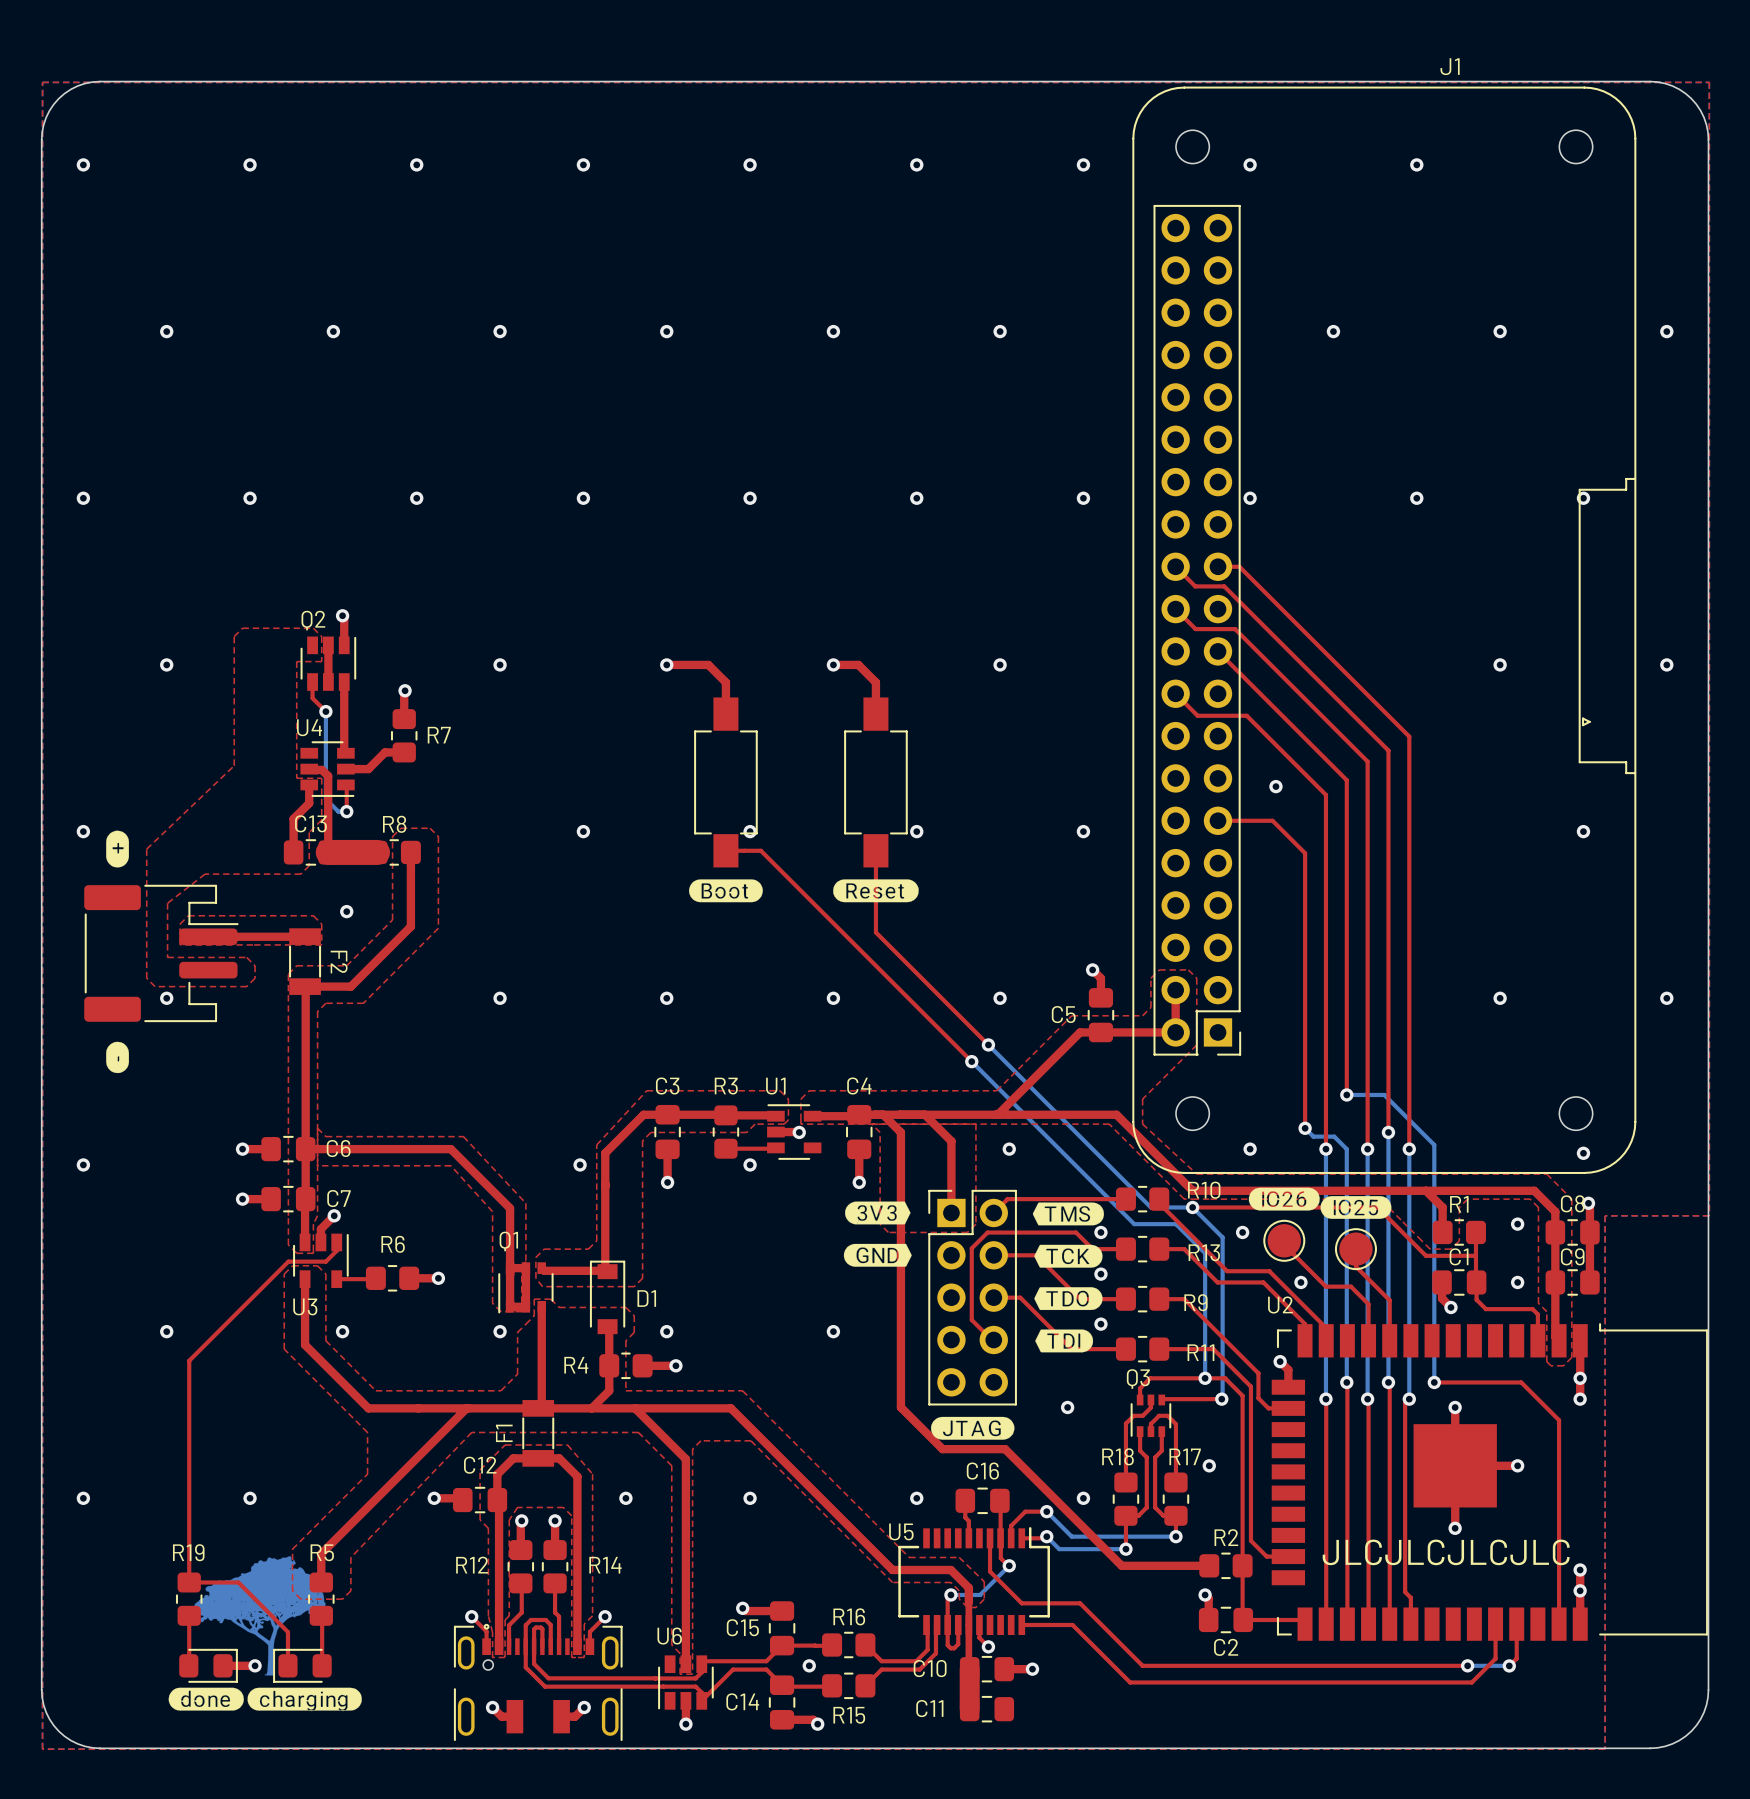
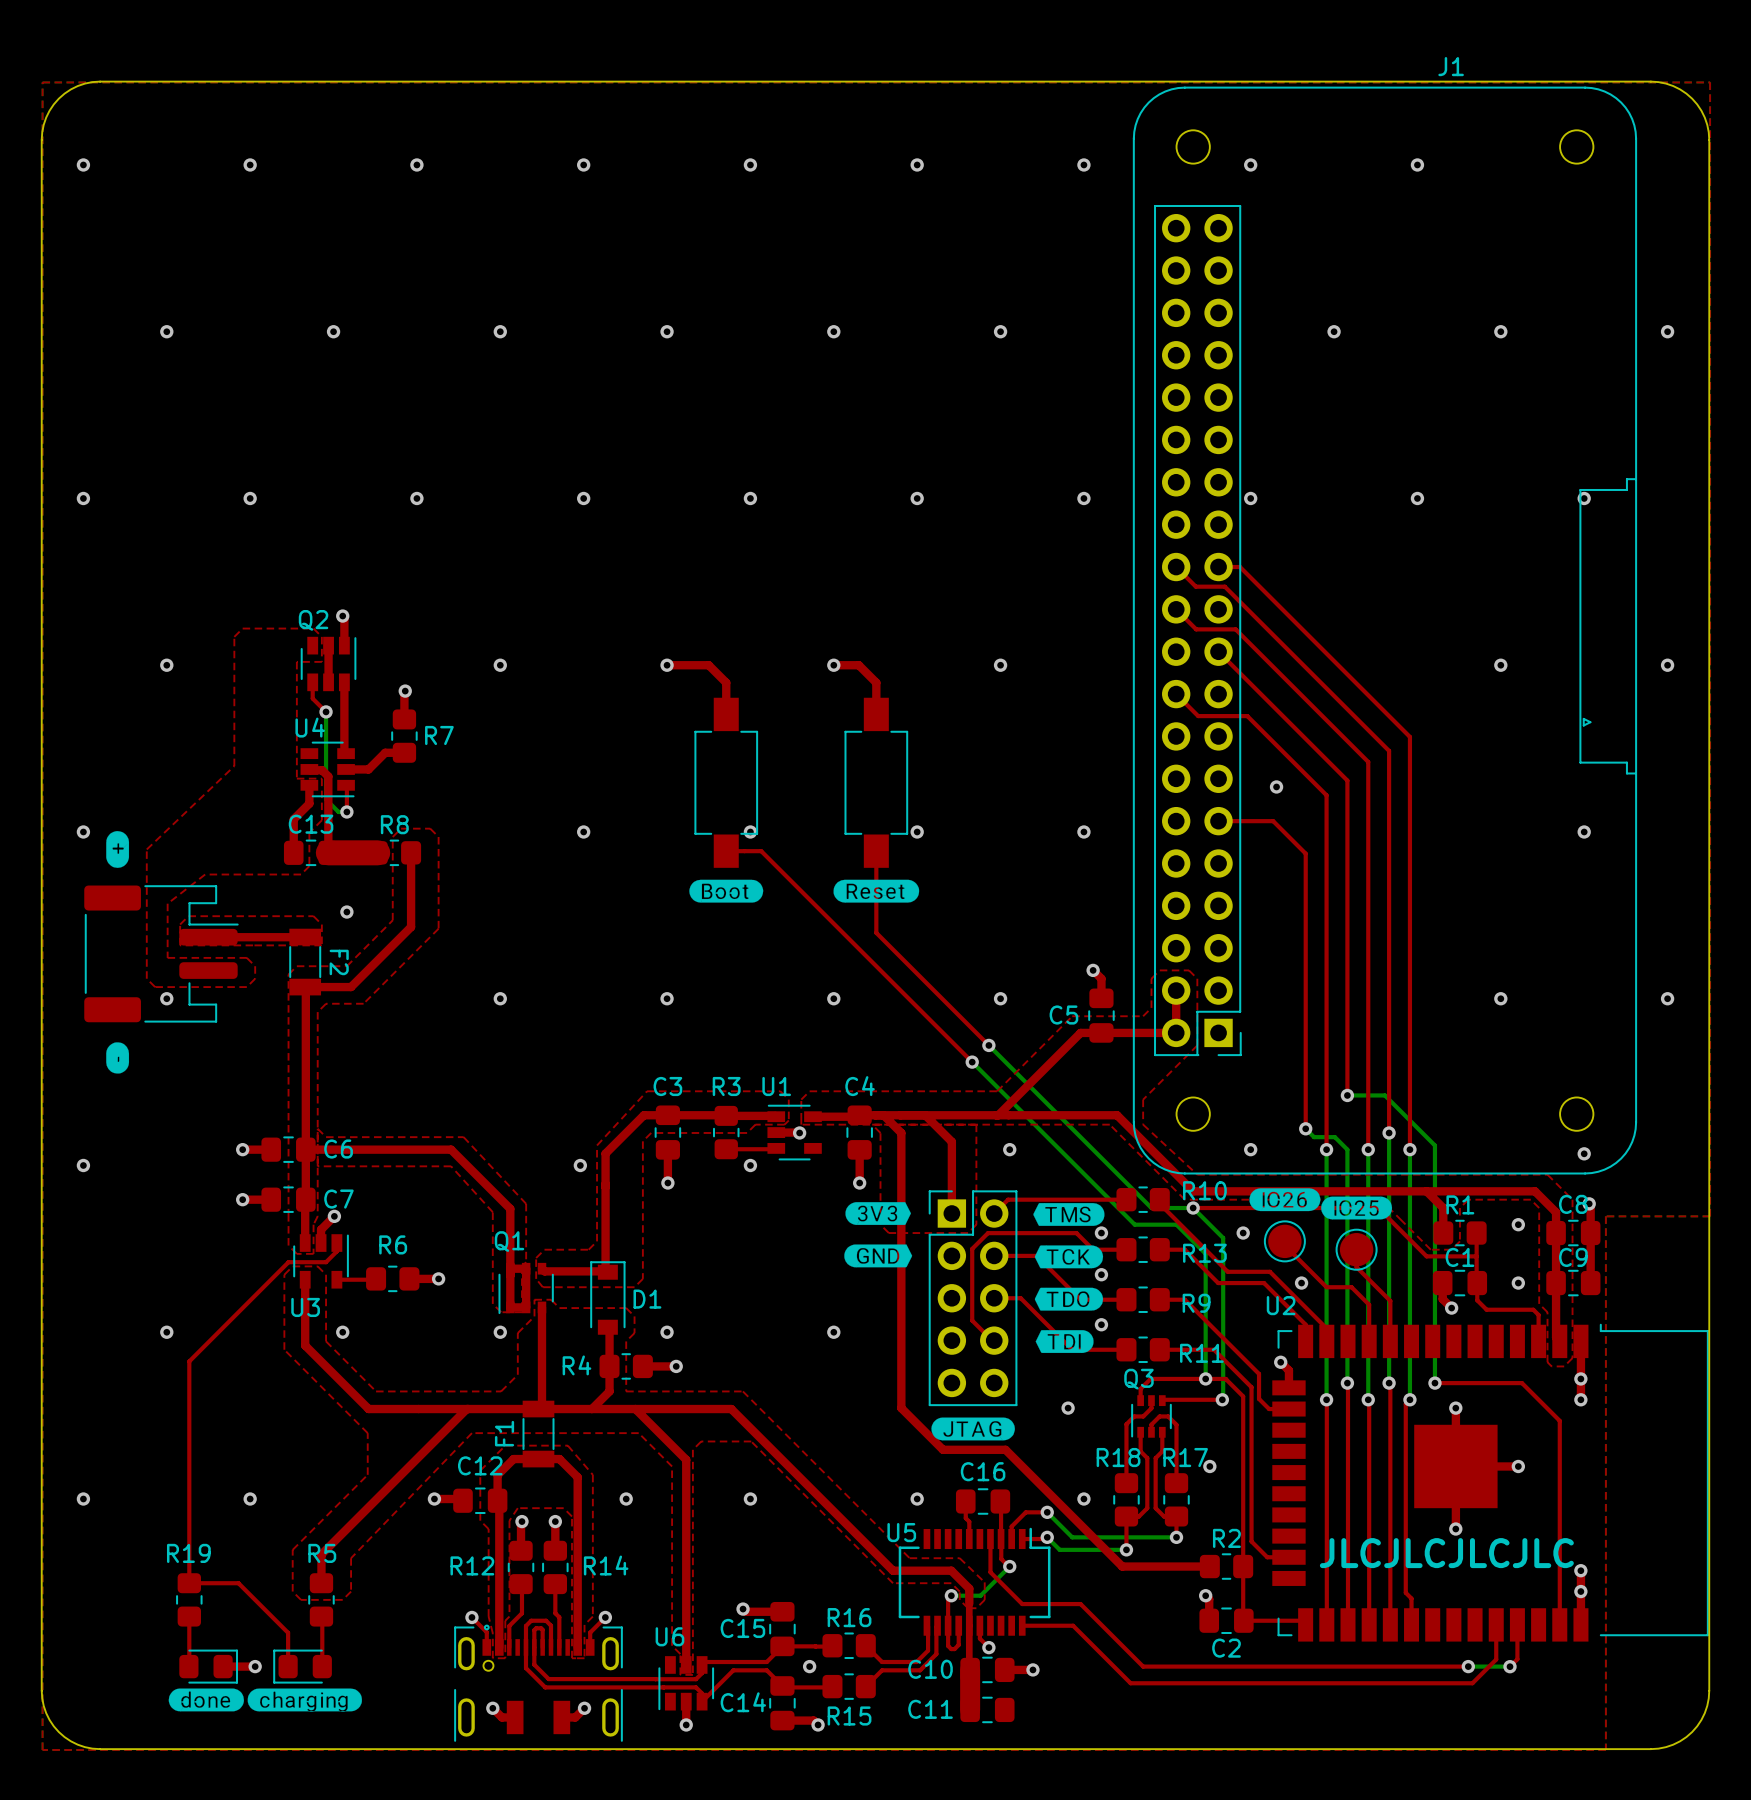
drawing: [192, 1556, 326, 1676] -> none

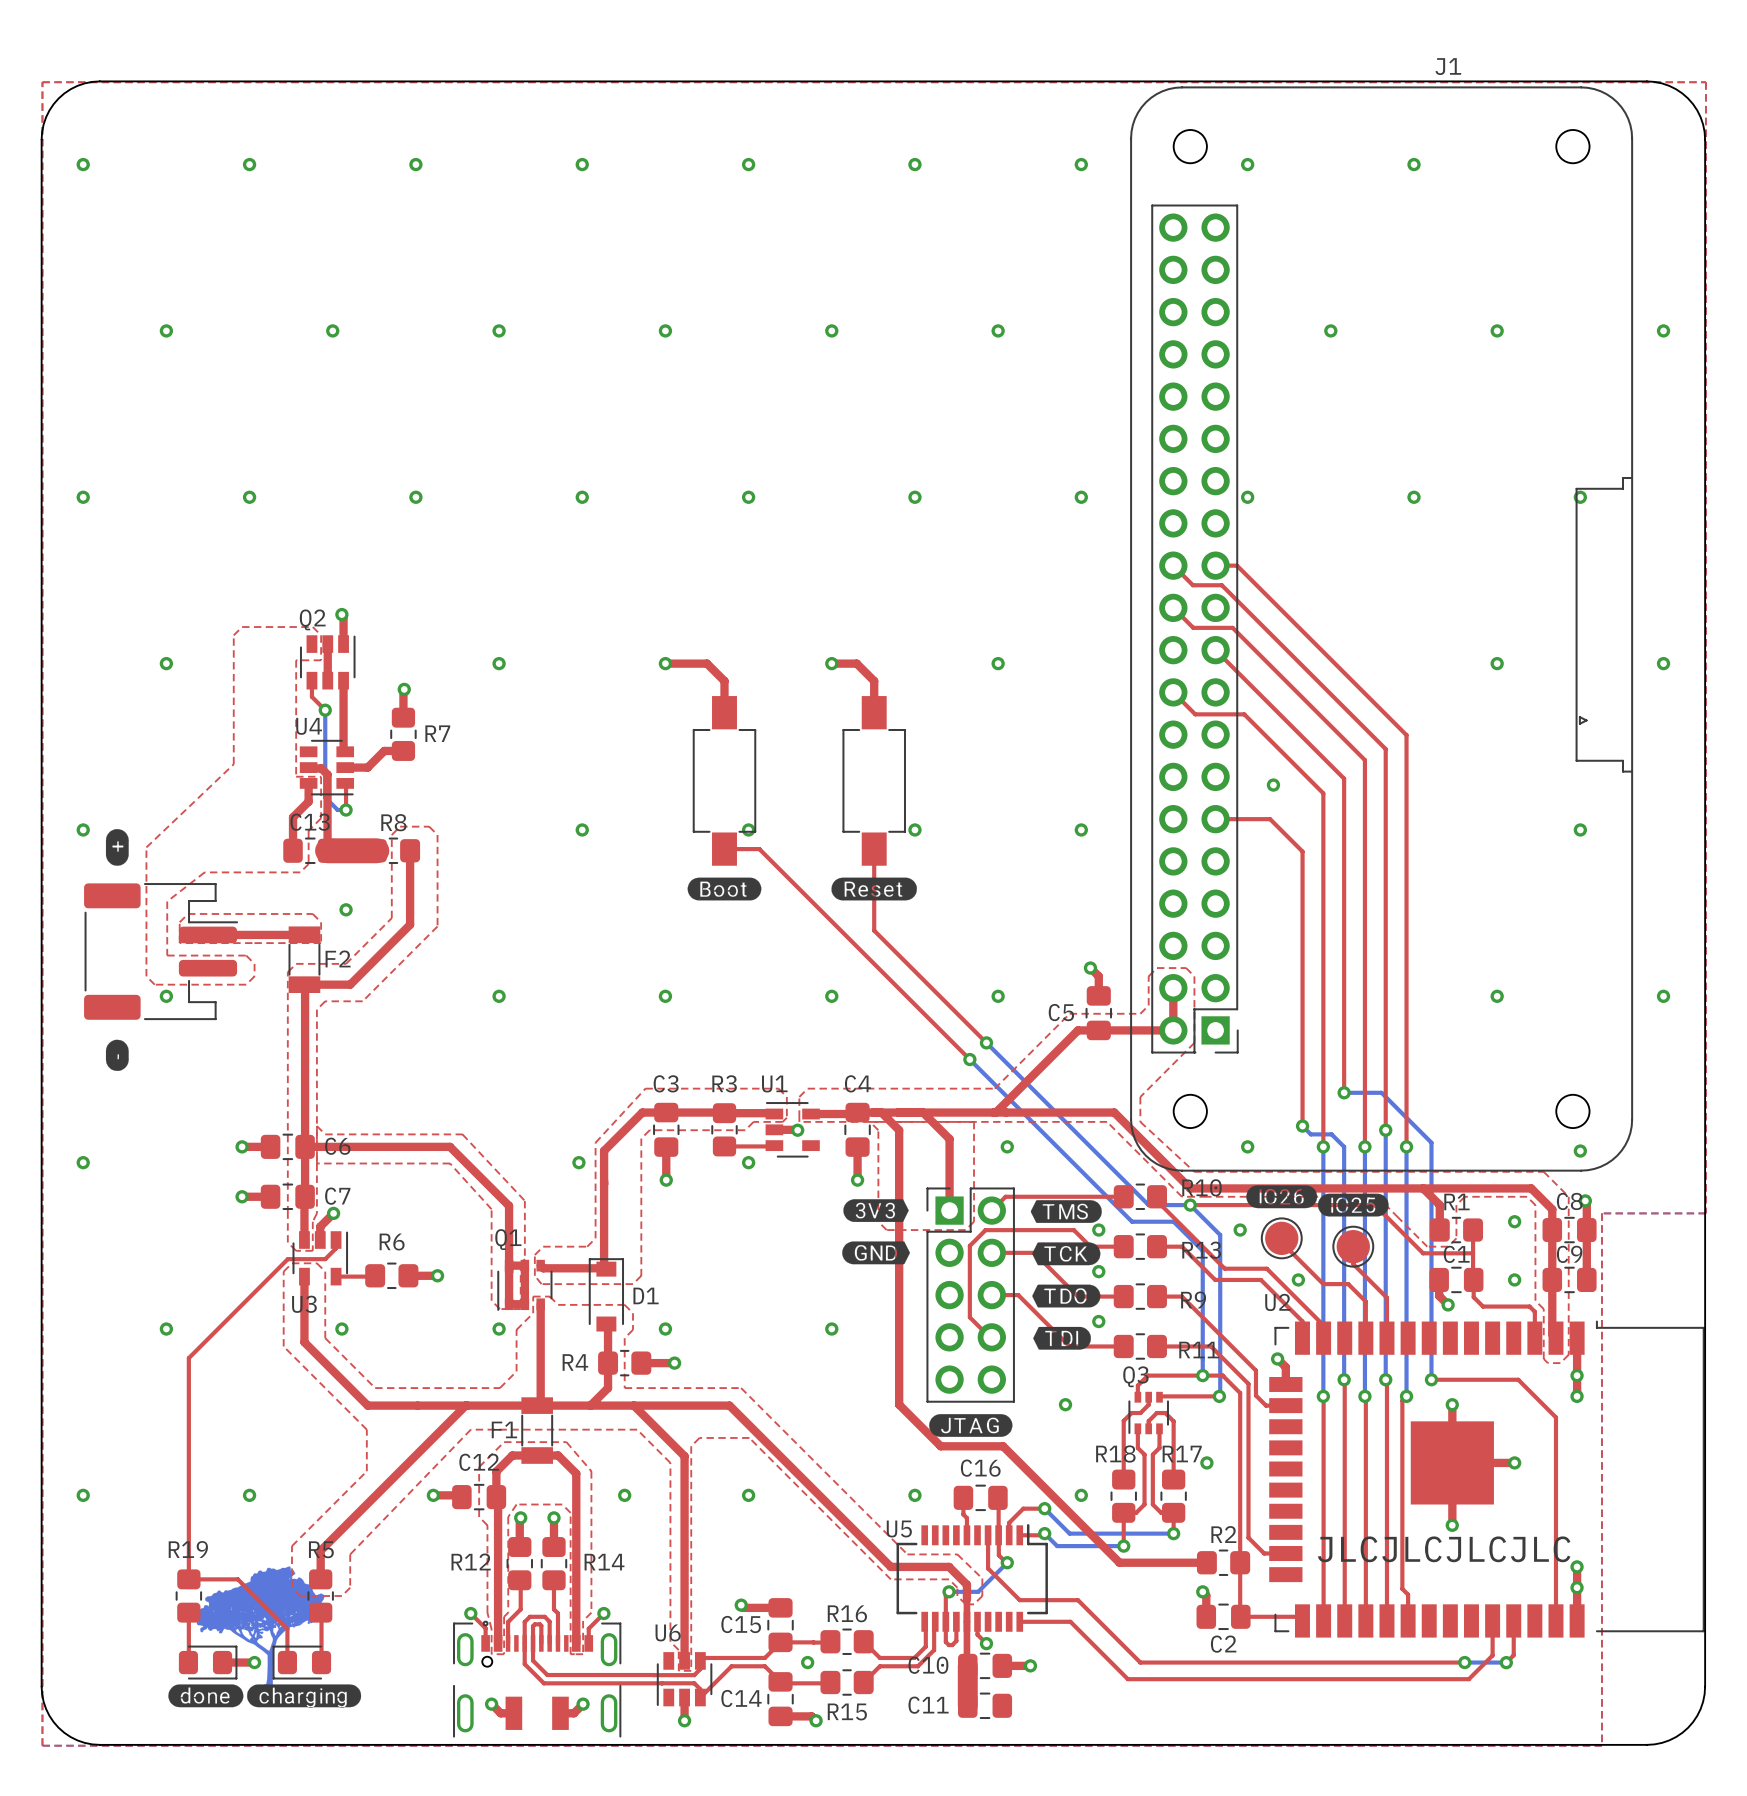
F2 name rotation: 0° (339, 962) -> 90° counterclockwise (338, 958)
F1 name rotation: 0° (504, 1433) -> 90° clockwise (504, 1429)
drawing: none -> [192, 1566, 325, 1686]

